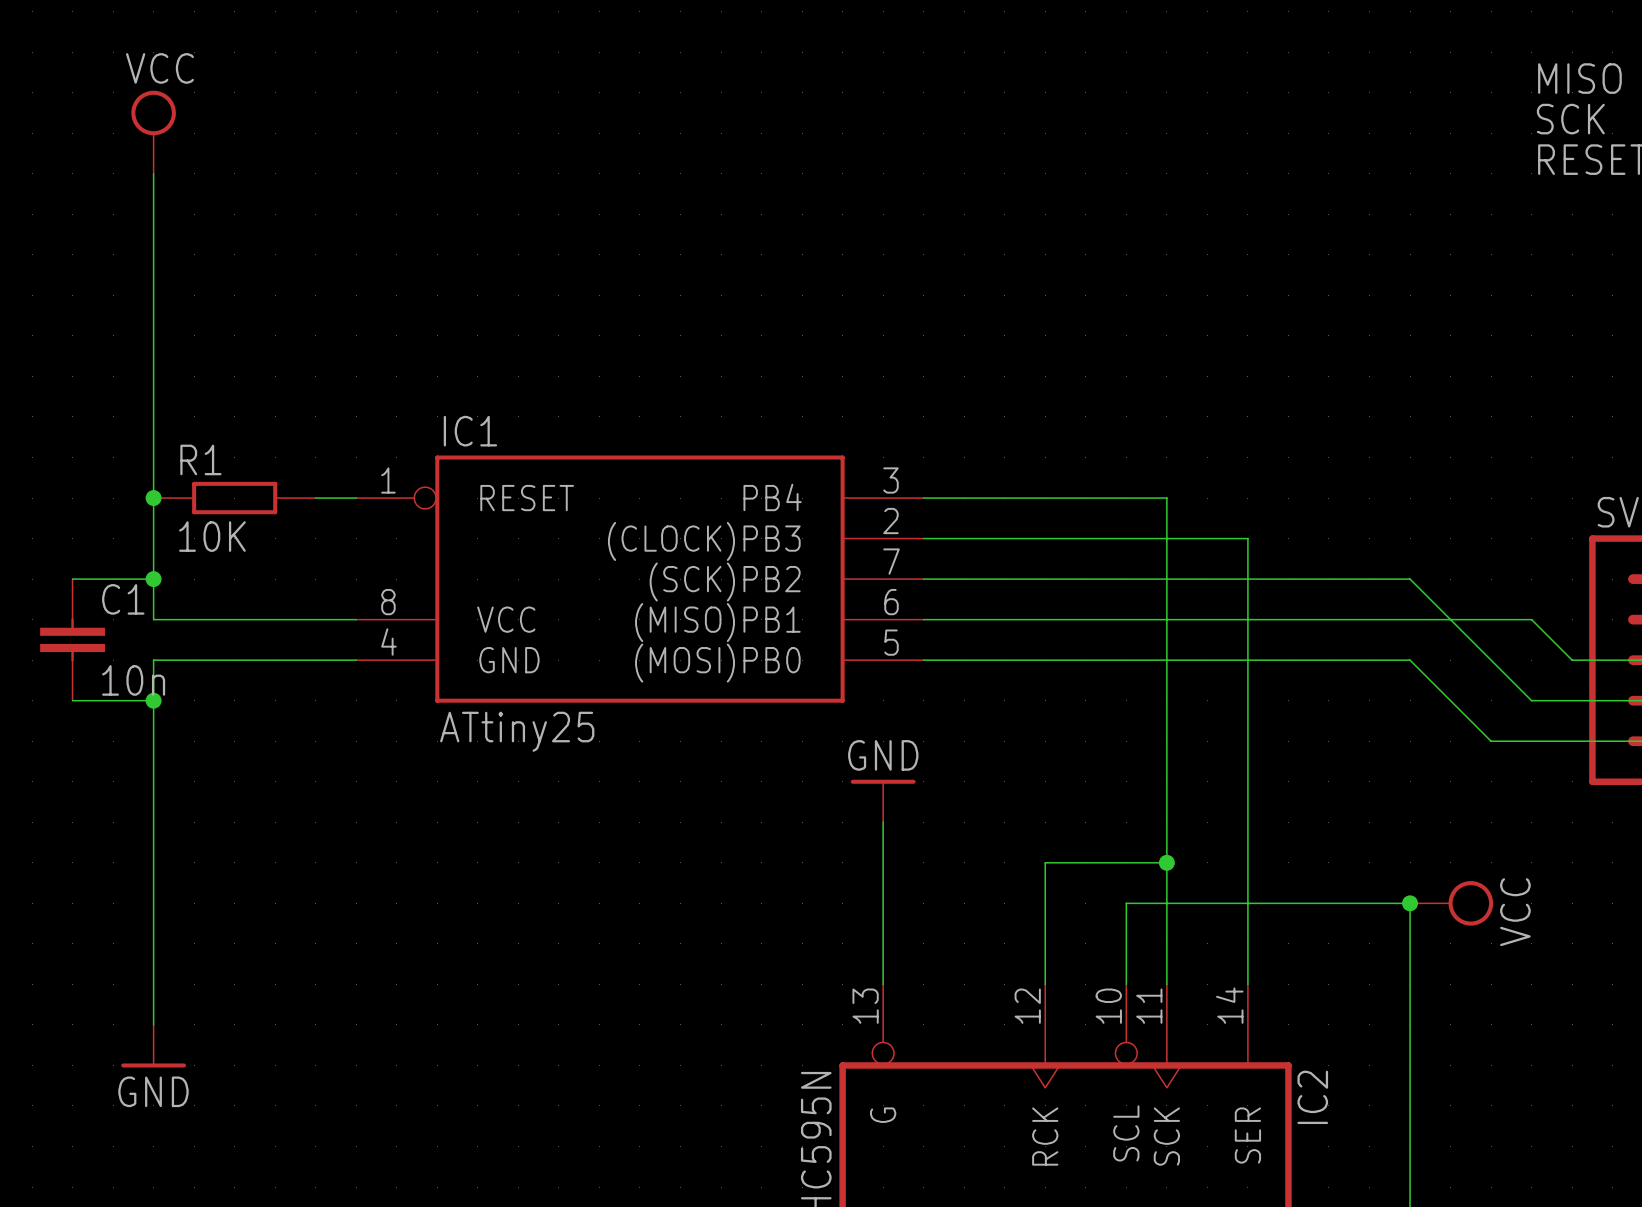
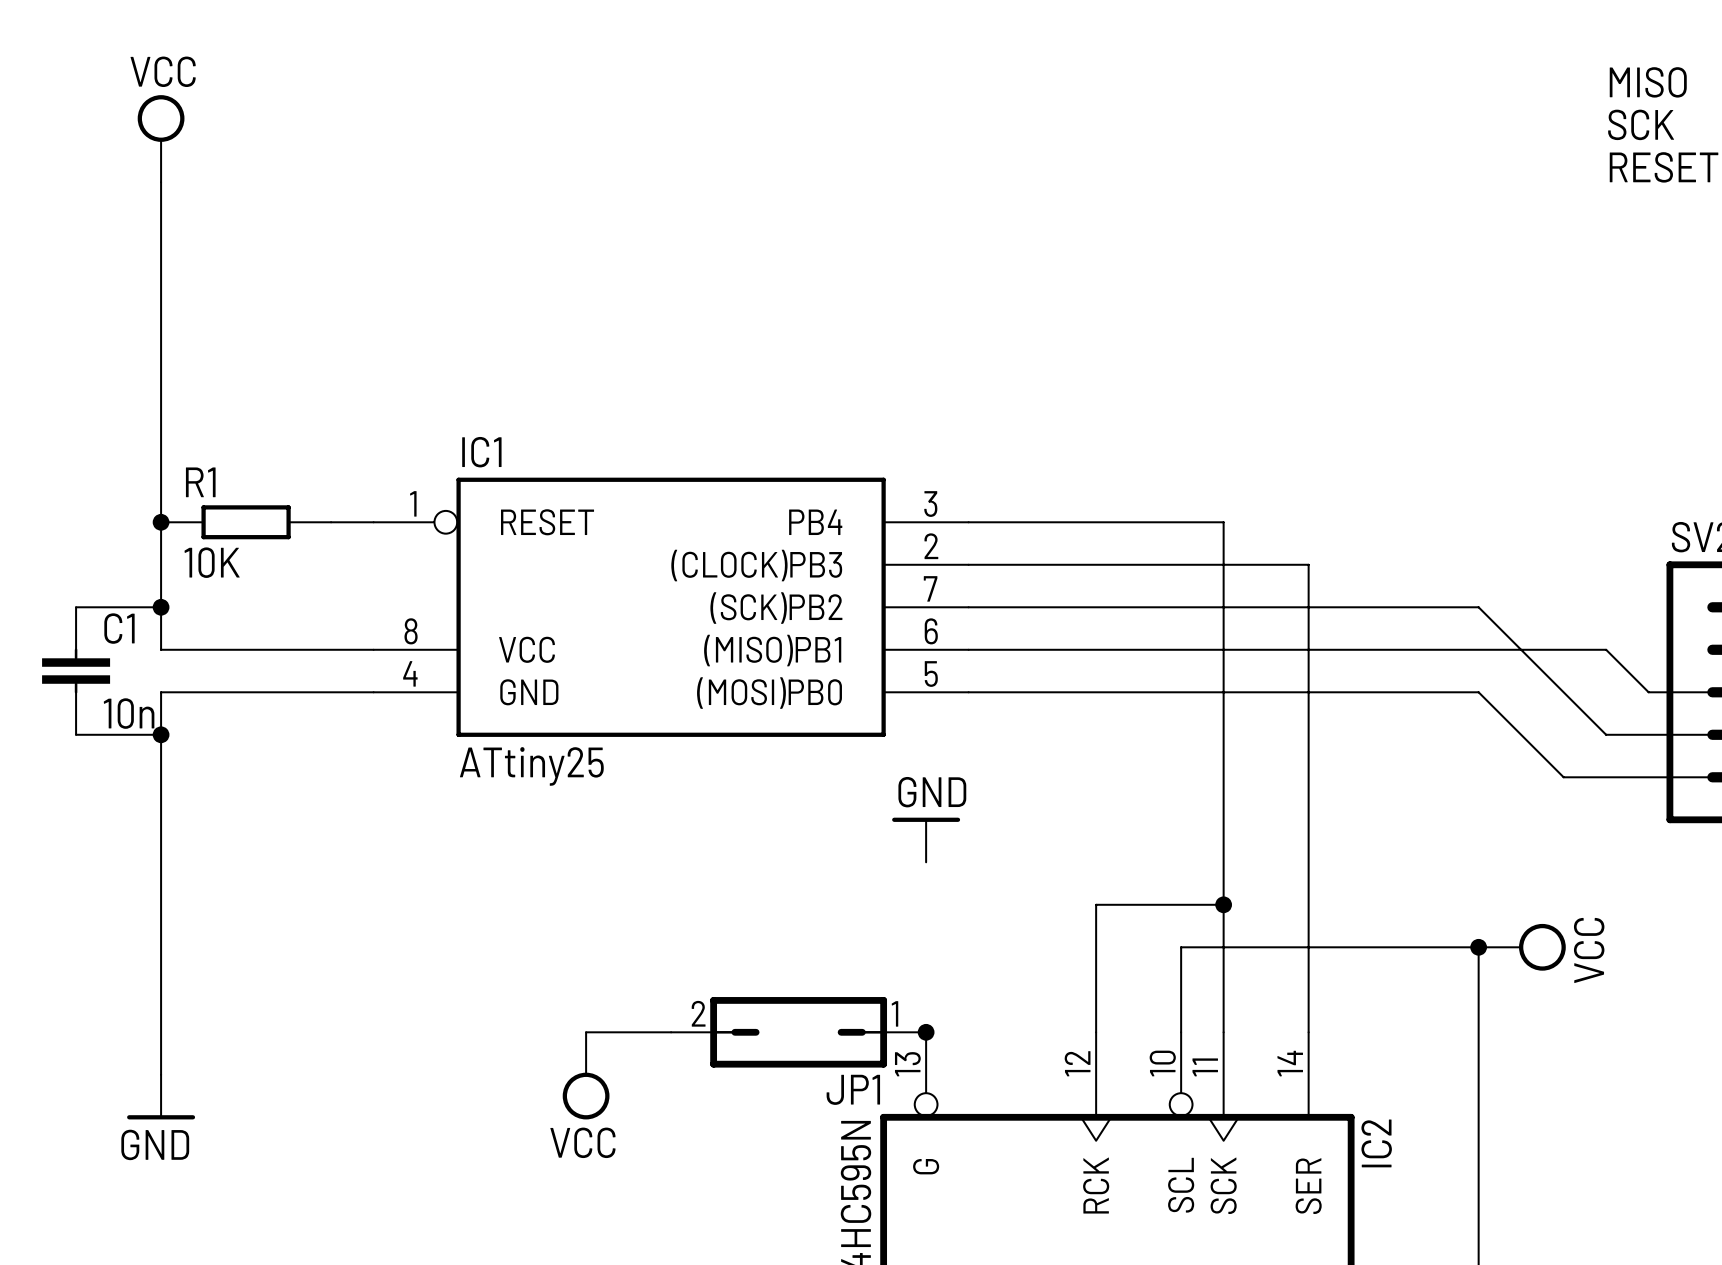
wire: (883, 822) (883, 984) -> none
wire: none -> (586, 1032) (671, 1032)
JP1: none -> (798, 1032)
junction: none -> (926, 1032)
power symbol: none -> VCC (586, 1075)

